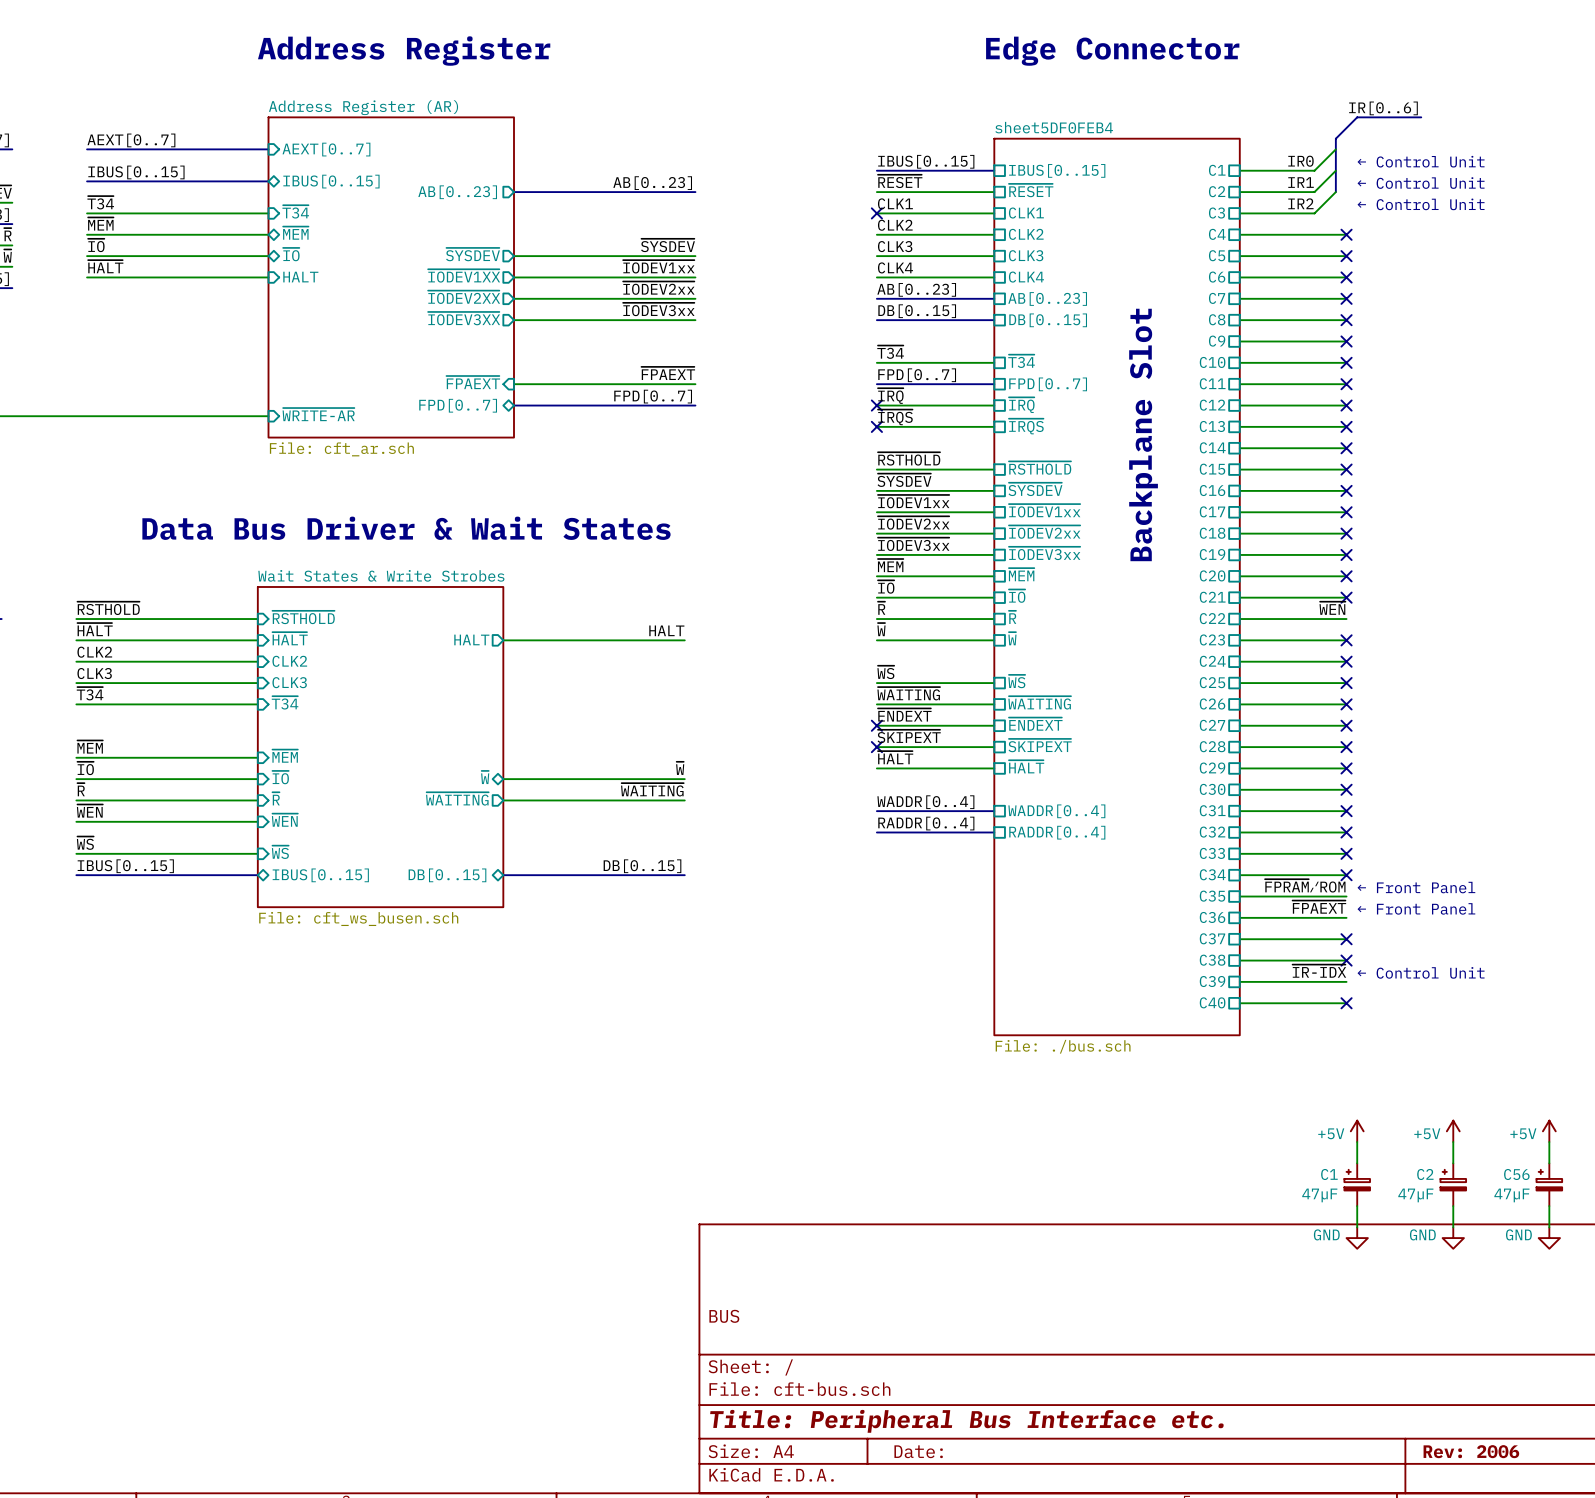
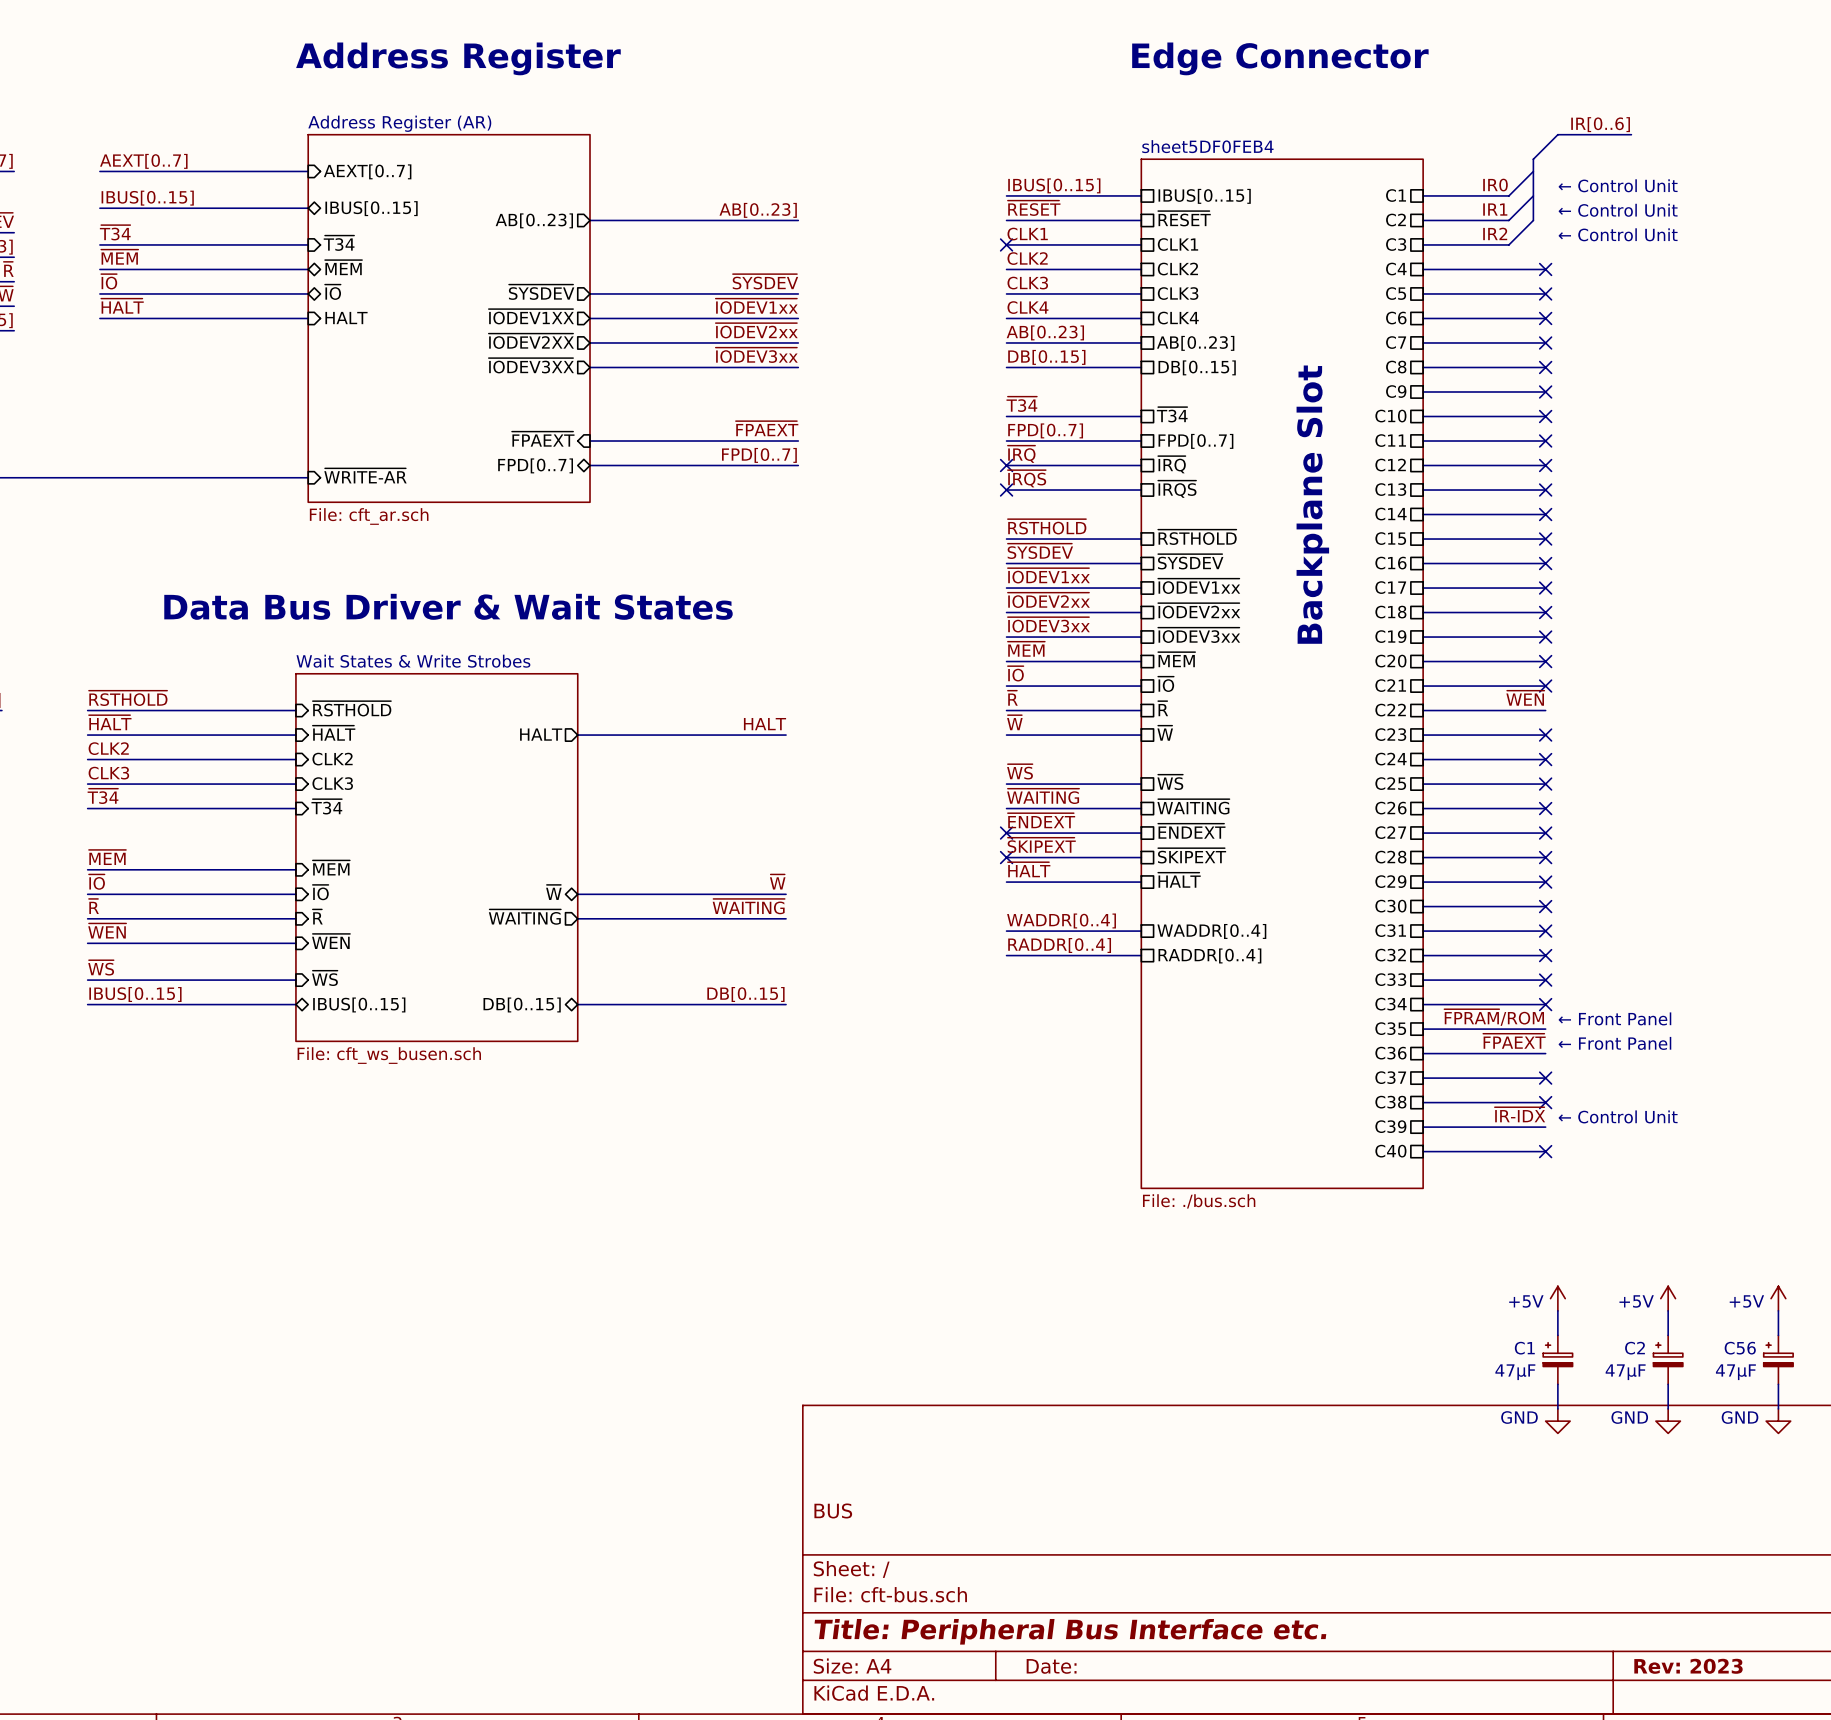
title block: Rev: 2006 (1471, 1451) -> Rev: 2023 (1688, 1666)

